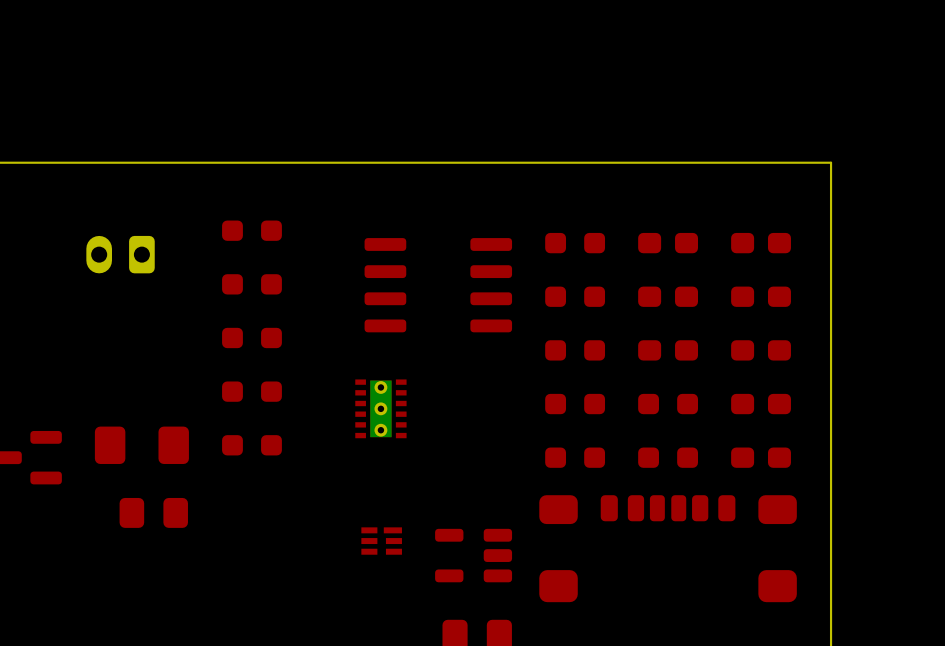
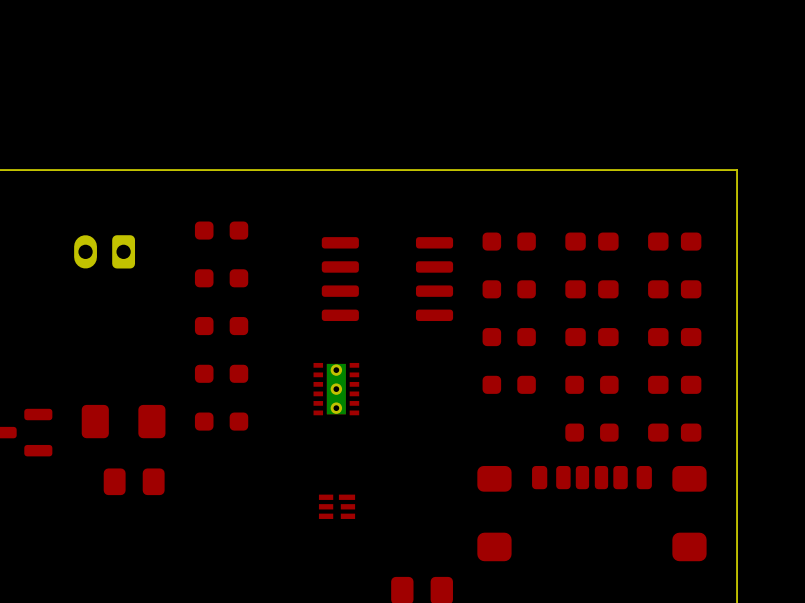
part: (575, 457) -> none
part: (473, 555) -> none

